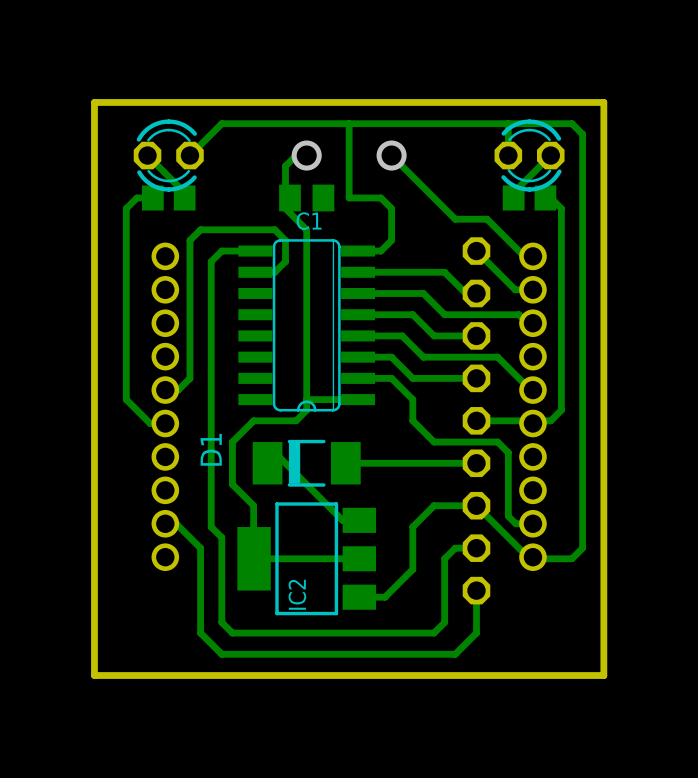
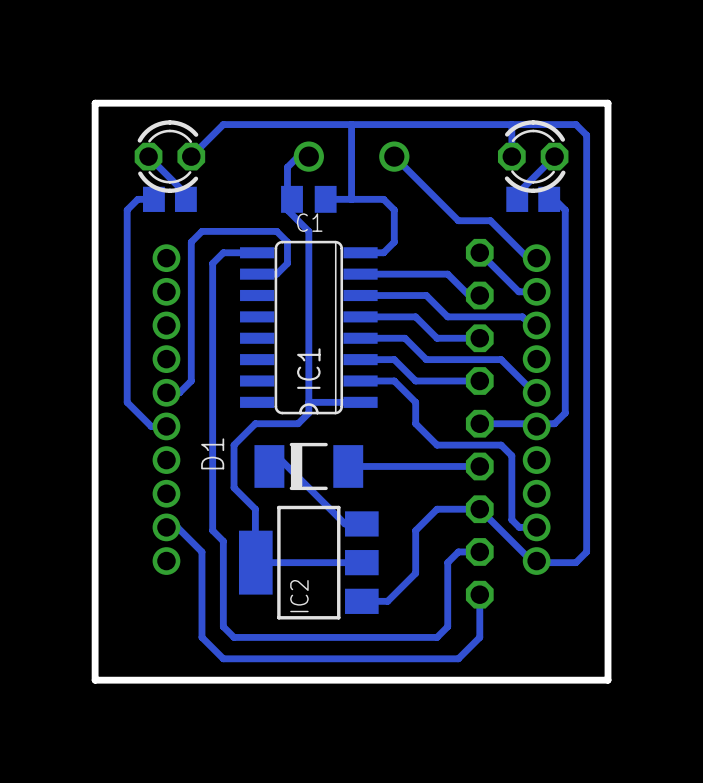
track: none -> (351, 199) (325, 199)
IC1 name: none -> IC1 (308, 368)

